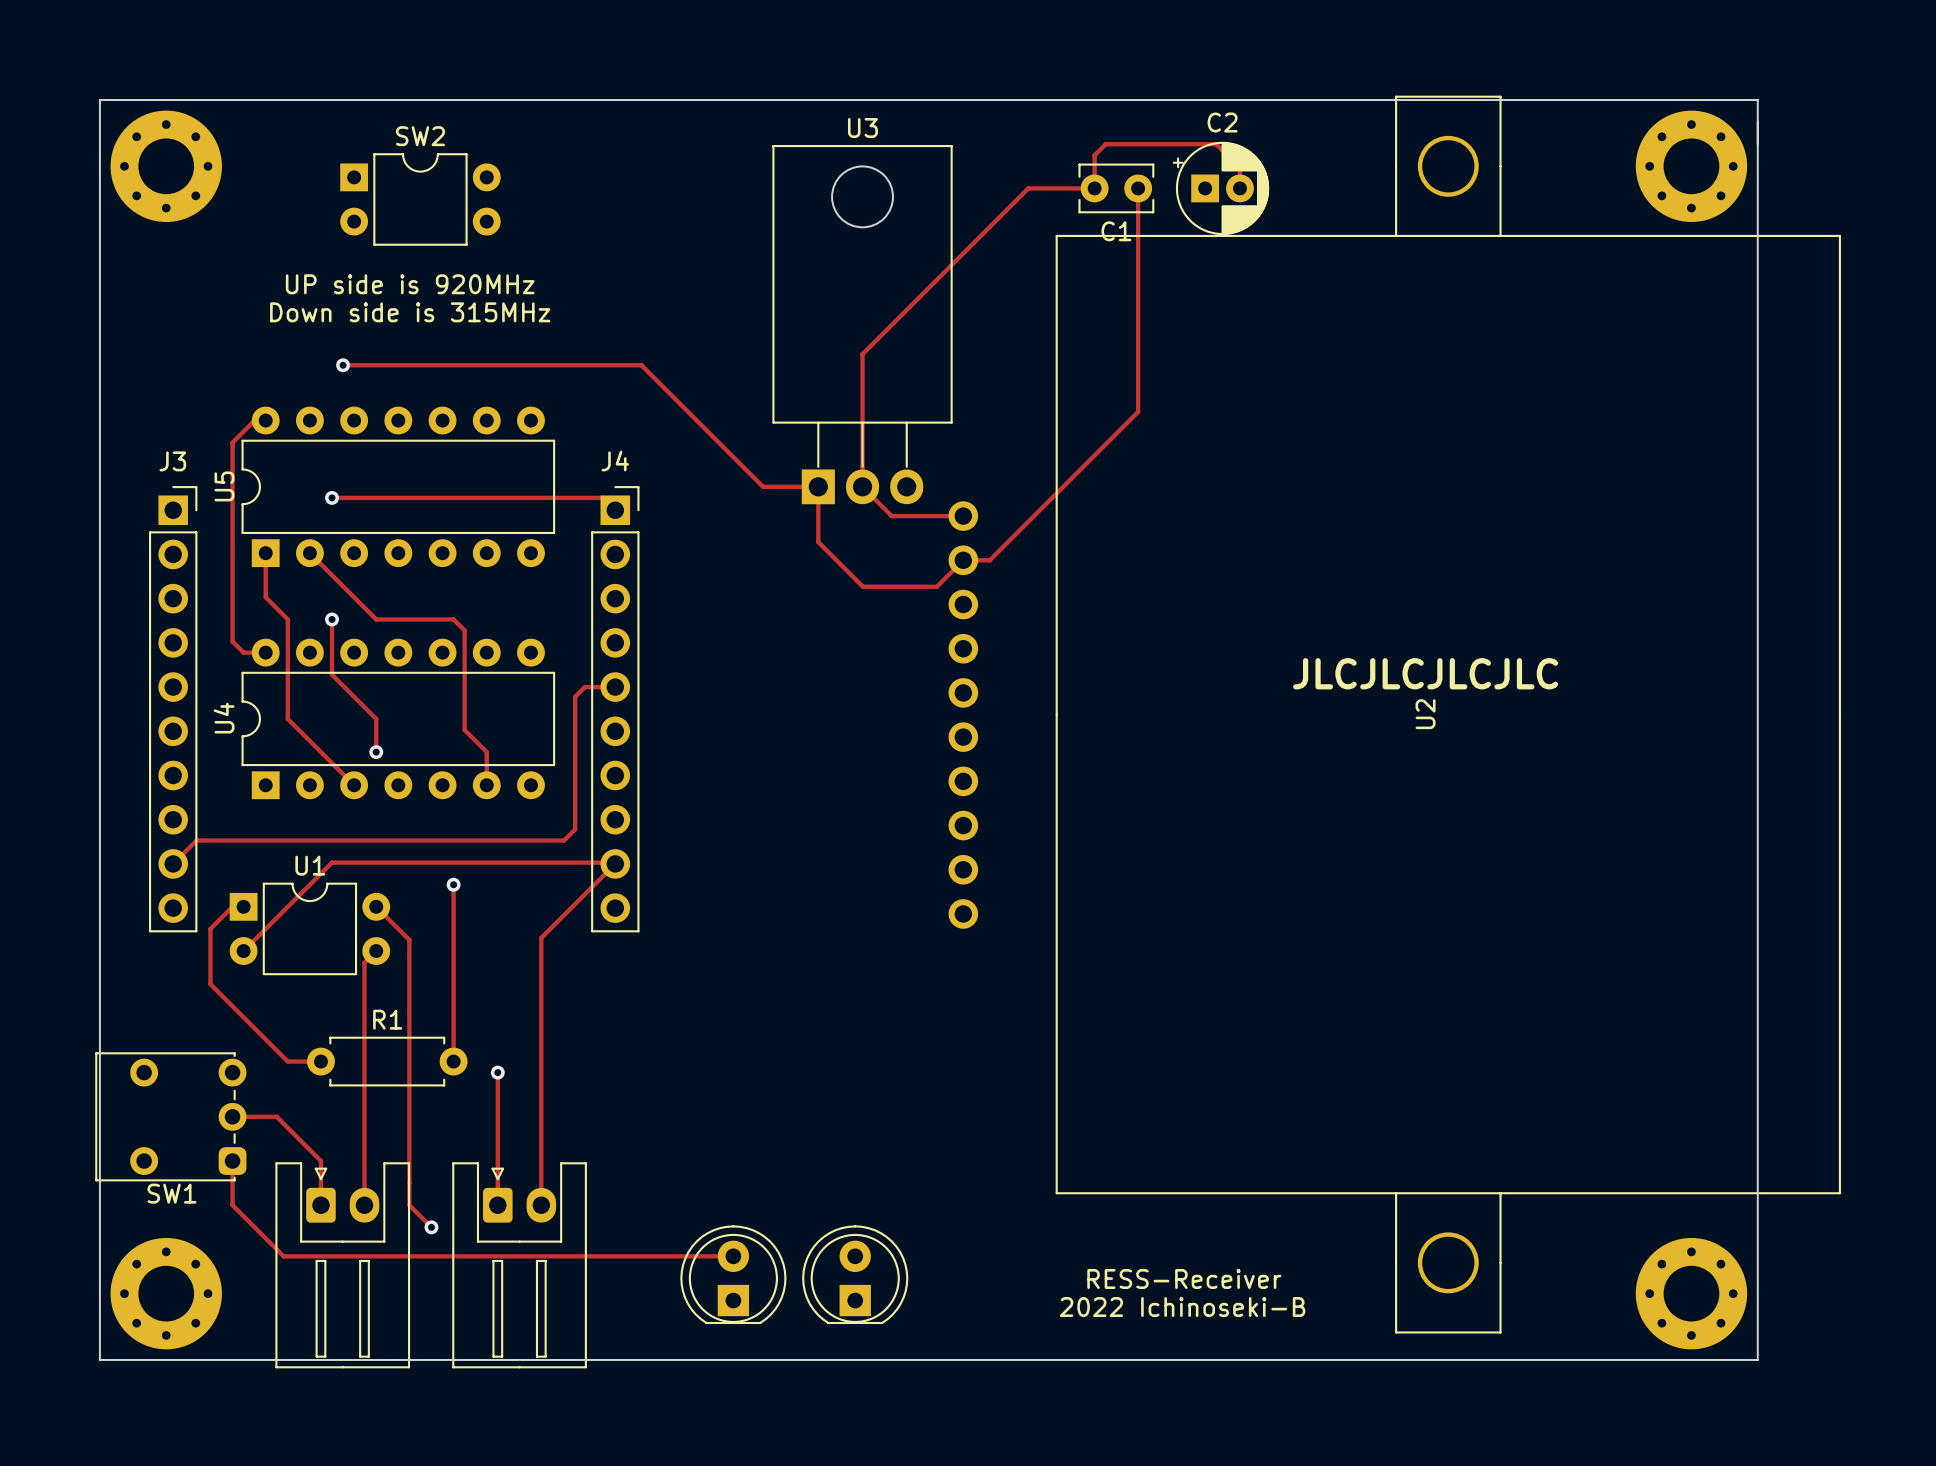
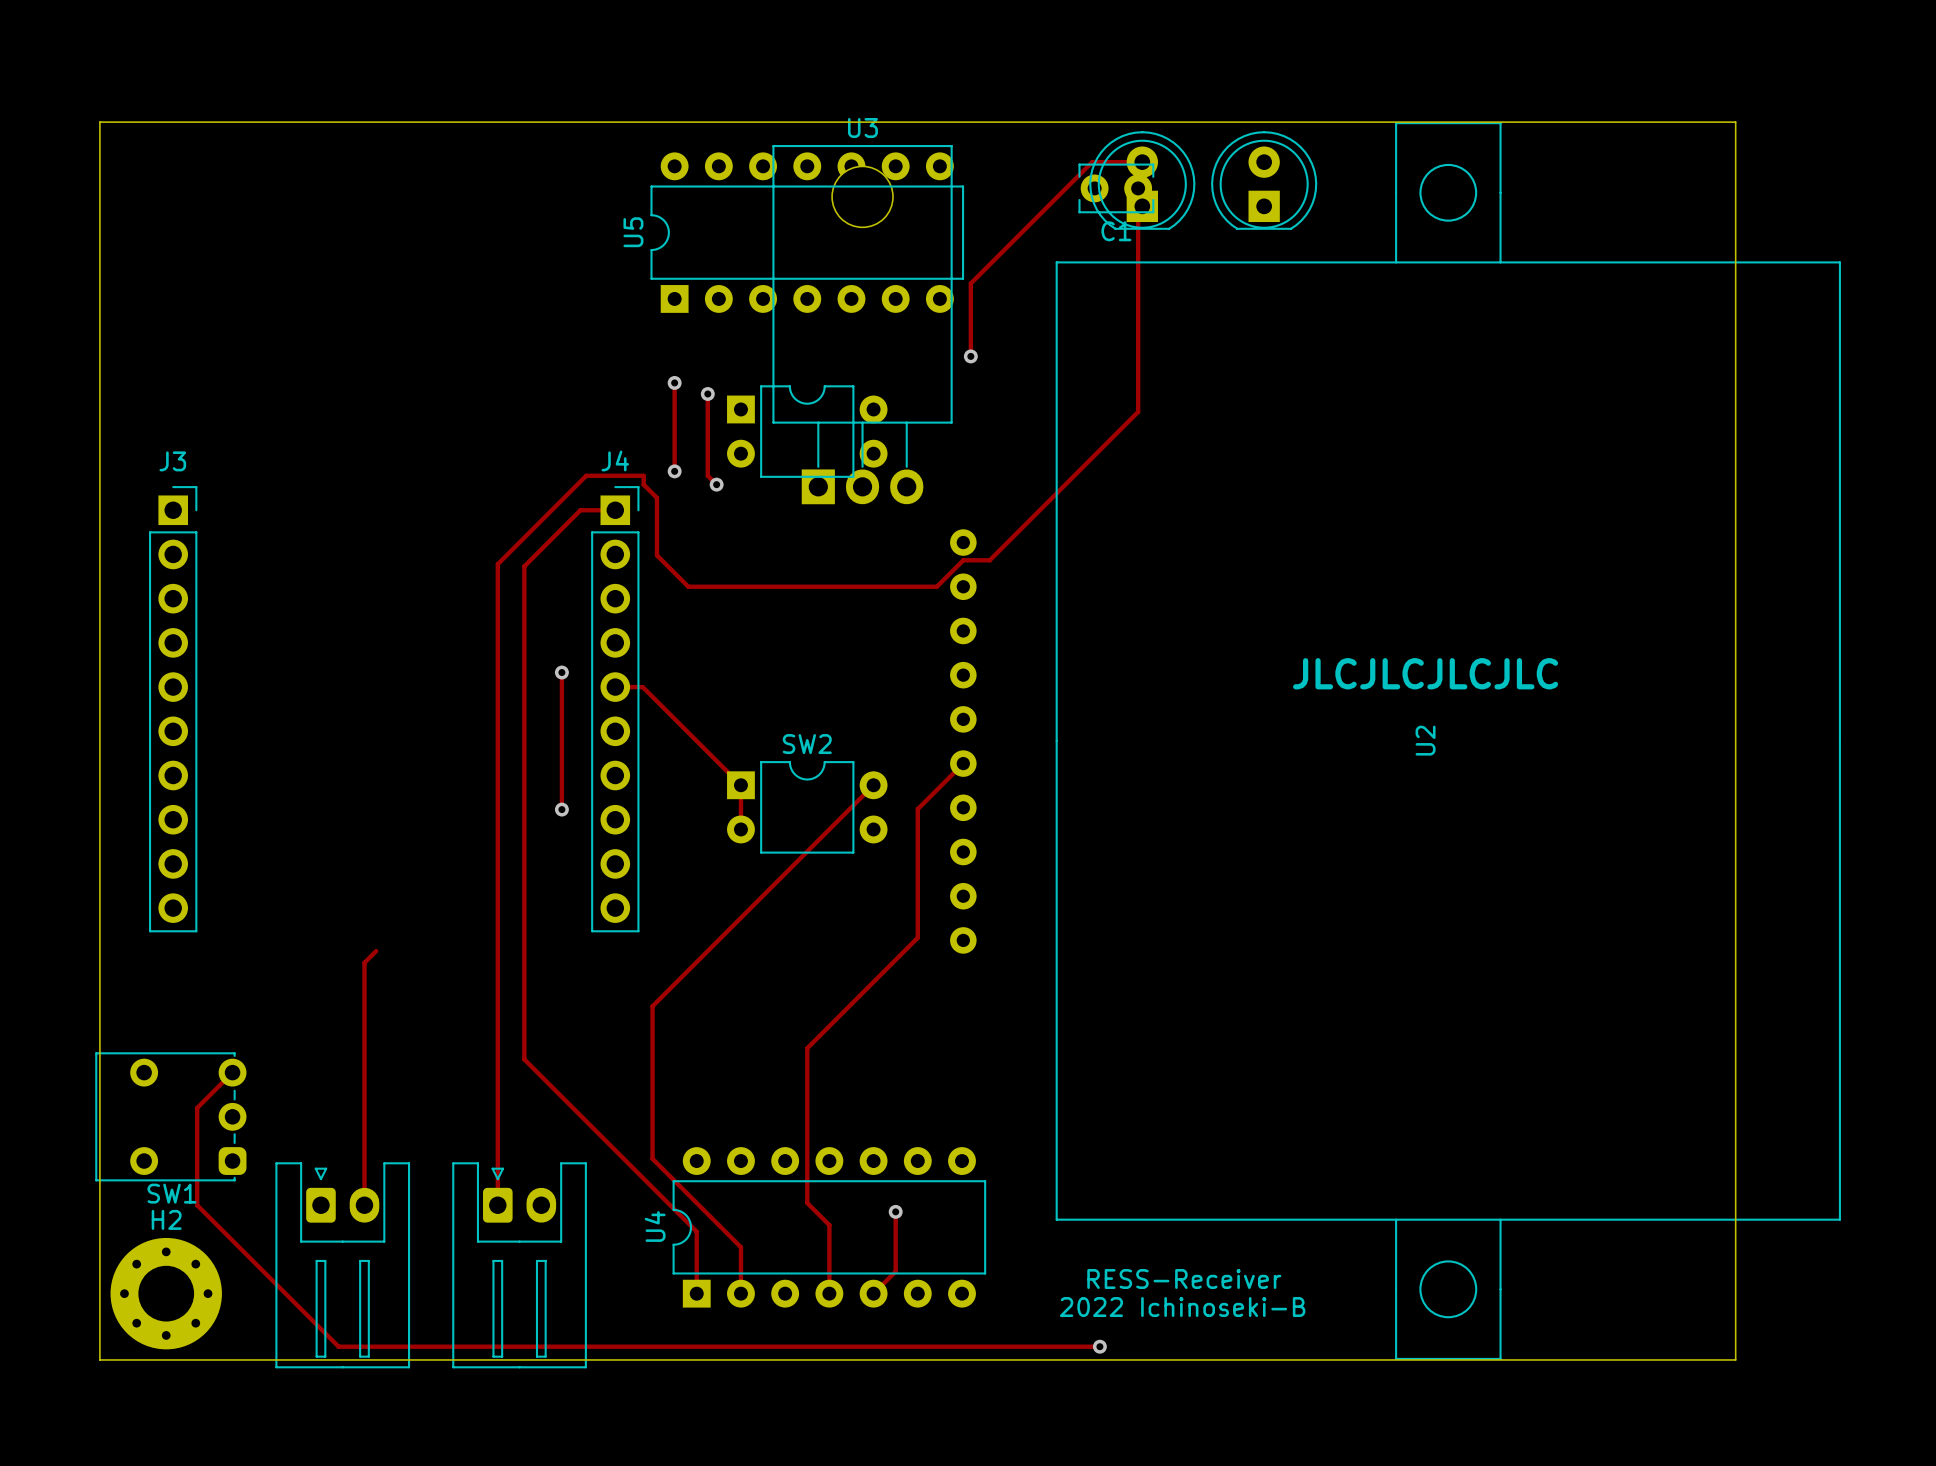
U2 footprint: [948, 95, 1841, 1334] -> [950, 122, 1841, 1360]
board edge: (99, 122) (99, 100) (1757, 100) (1757, 1359) (1735, 1359) -> (99, 122) (1735, 122) (1735, 1359)
track: none -> (1142, 162) (1092, 162) (970, 283) (970, 356)
part: (166, 166) -> none
part: (1691, 166) -> none
part: none -> (1142, 180)
part: none -> (1264, 180)
C2: (1220, 188) -> none
track: (1239, 188) (1239, 167) (1216, 144) (1105, 144) (1094, 155) (1094, 188) (1028, 188) (963, 253) -> none
SW2 position: (420, 199) -> (807, 807)
track: (962, 254) (862, 354) (862, 486) (891, 516) (963, 516) -> none
text: UP side is 920MHz (410, 284) -> none
text: Down side is 315MHz (410, 312) -> none
via: none -> (970, 356)
track: (343, 365) (641, 365) (763, 486) (818, 486) (818, 542) (862, 586) -> (497, 1072) (497, 564) (586, 475) (643, 475) (643, 484) (656, 497) (656, 555) (688, 586) (862, 586)
via: (343, 365) -> none
track: none -> (674, 382) (674, 471)
via: none -> (674, 382)
track: none -> (707, 394) (707, 475) (716, 484)
via: none -> (707, 394)
track: (265, 420) (254, 420) (232, 442) (232, 641) (243, 652) (265, 652) -> none
part: none -> (807, 431)
via: none -> (674, 471)
via: none -> (716, 484)
U5 position: (398, 486) -> (807, 232)
track: (332, 497) (602, 497) (615, 510) -> (696, 1293) (696, 1231) (524, 1059) (524, 566) (580, 510) (615, 510)
via: (332, 497) -> none
track: (265, 553) (265, 597) (287, 619) (287, 718) (354, 785) -> none
track: (309, 553) (376, 619) (453, 619) (464, 630) (464, 729) (486, 752) (486, 785) -> none
track: (332, 619) (332, 674) (376, 718) (376, 752) -> none
via: (332, 619) -> none
track: none -> (561, 672) (561, 809)
via: none -> (561, 672)
track: (615, 687) (584, 687) (575, 696) (575, 829) (564, 840) (196, 840) (173, 863) -> (615, 687) (642, 687) (740, 785) (740, 829)
U4 position: (398, 718) -> (829, 1227)
via: (376, 752) -> none
track: none -> (963, 763) (917, 809) (917, 937) (807, 1048) (807, 1203) (829, 1225) (829, 1293)
track: none -> (873, 785) (652, 1006) (652, 1158) (740, 1247) (740, 1293)
via: none -> (561, 809)
track: (453, 884) (453, 1061) -> none
via: (453, 884) -> none
track: (243, 906) (232, 906) (210, 928) (210, 984) (287, 1061) (320, 1061) -> none
track: (376, 906) (409, 939) (409, 1205) (431, 1227) -> none
U1: (309, 928) -> none
track: (243, 951) (332, 862) (613, 862) (615, 863) (541, 937) (541, 1205) -> none
R1: (387, 1061) -> none
track: none -> (232, 1072) (197, 1107) (197, 1205) (338, 1346) (1099, 1346)
via: (497, 1072) -> none
track: (232, 1116) (276, 1116) (320, 1161) (320, 1205) -> none
track: (232, 1161) (232, 1205) (283, 1256) (733, 1256) -> none
track: none -> (895, 1211) (895, 1271) (873, 1293)
via: none -> (895, 1211)
H2 name: none -> H2 (166, 1219)
via: (431, 1227) -> none
part: (733, 1274) -> none
part: (855, 1274) -> none
part: (1691, 1293) -> none
via: none -> (1099, 1346)

